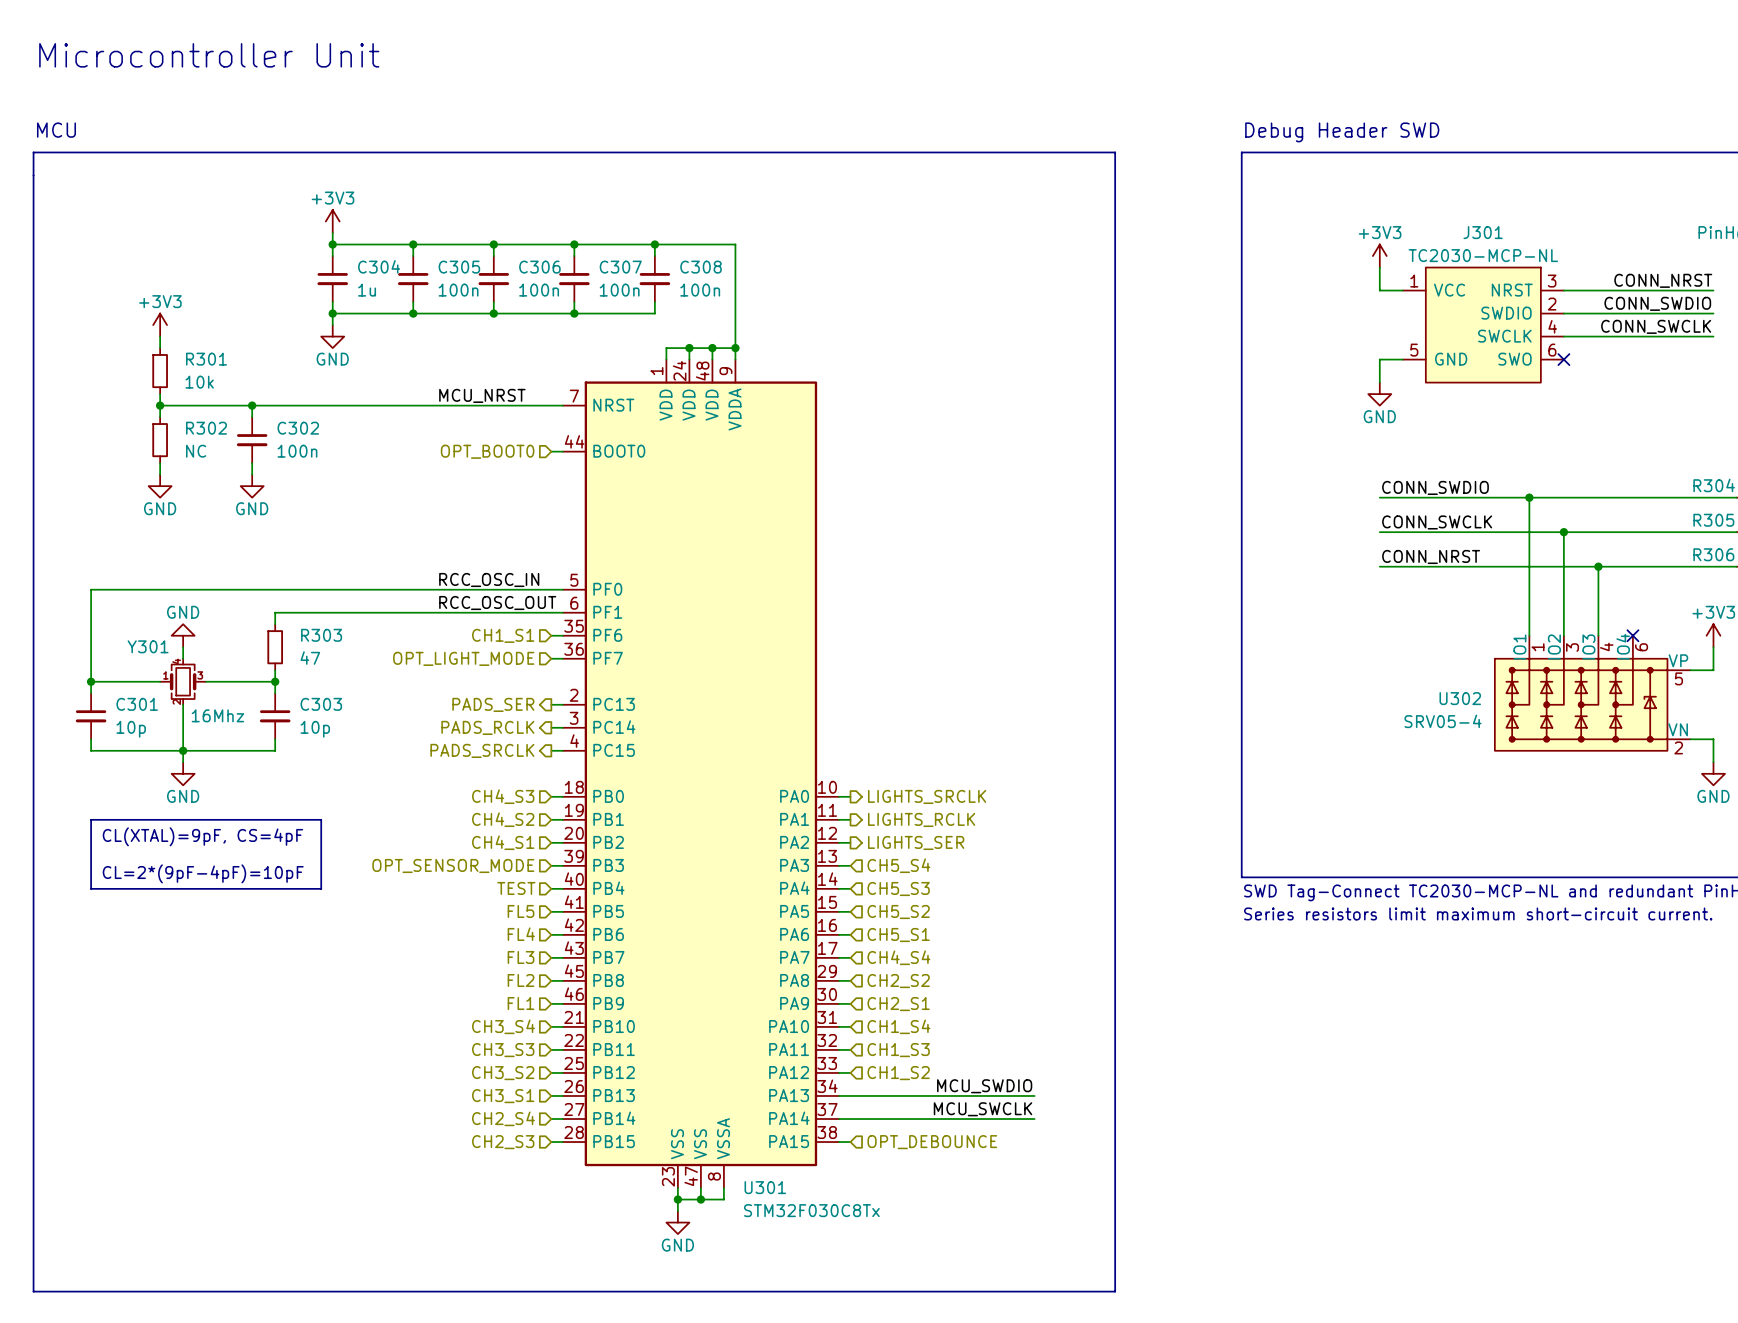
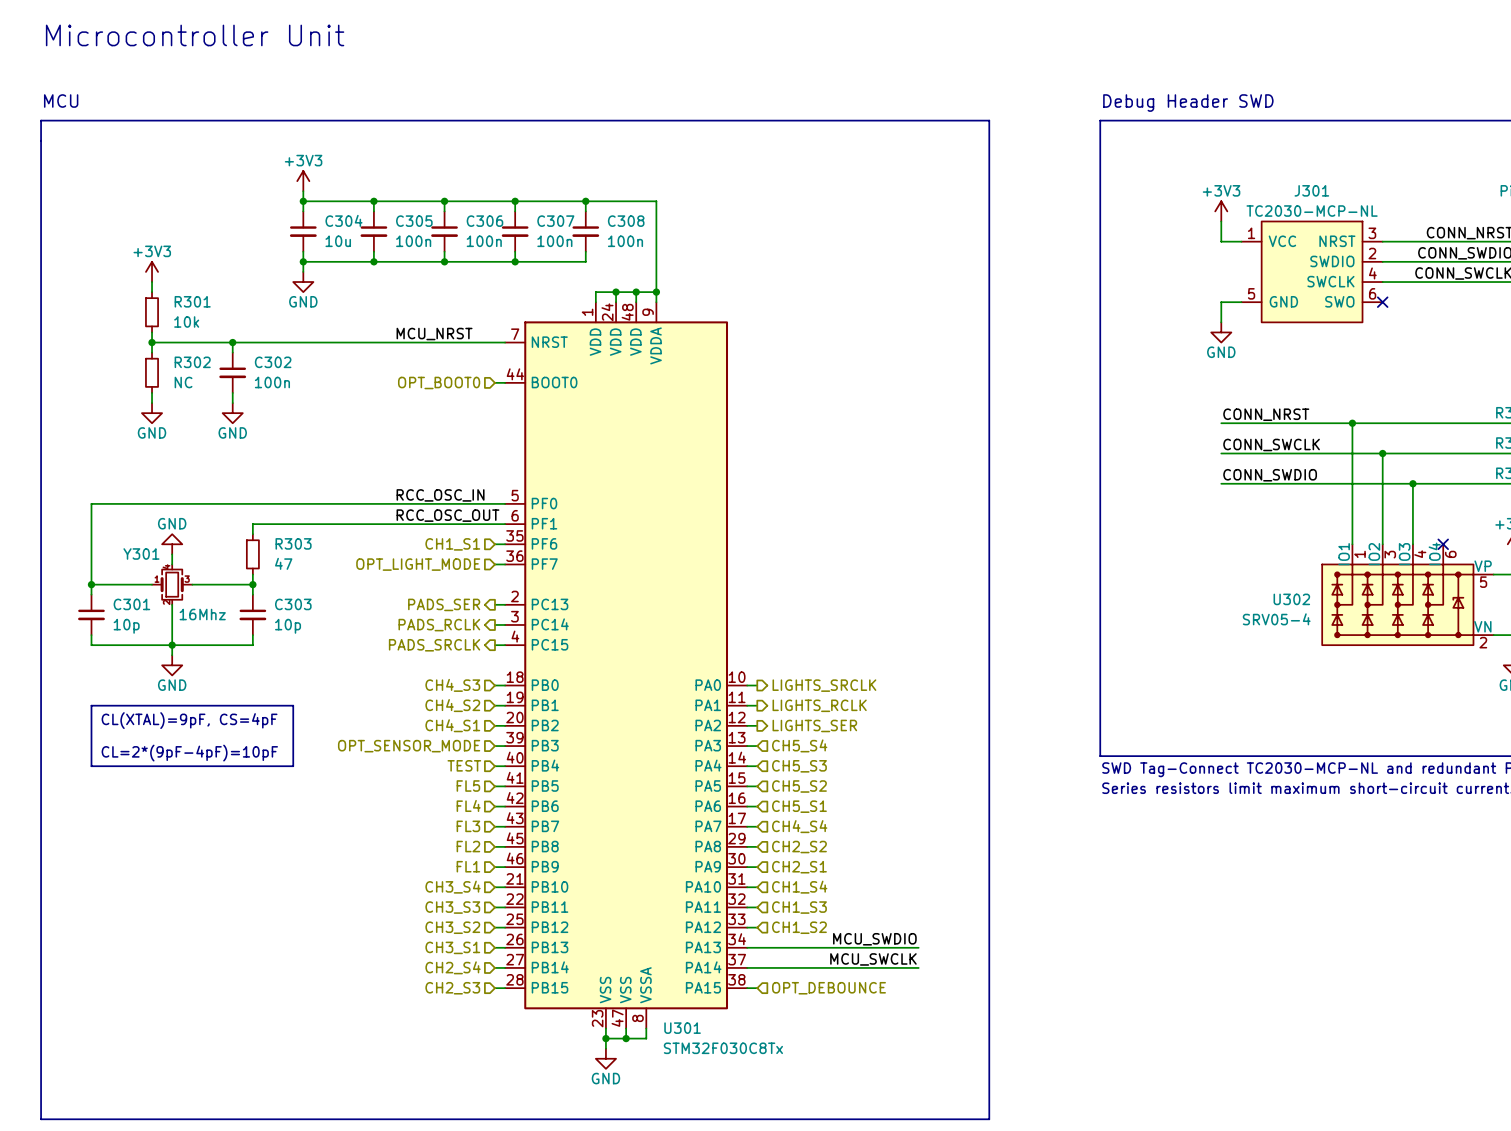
C304 value: 1u (367, 290) -> 10u (338, 241)
label: CONN_SWDIO (1435, 487) -> CONN_NRST (1266, 414)
label: CONN_NRST (1431, 556) -> CONN_SWDIO (1270, 475)

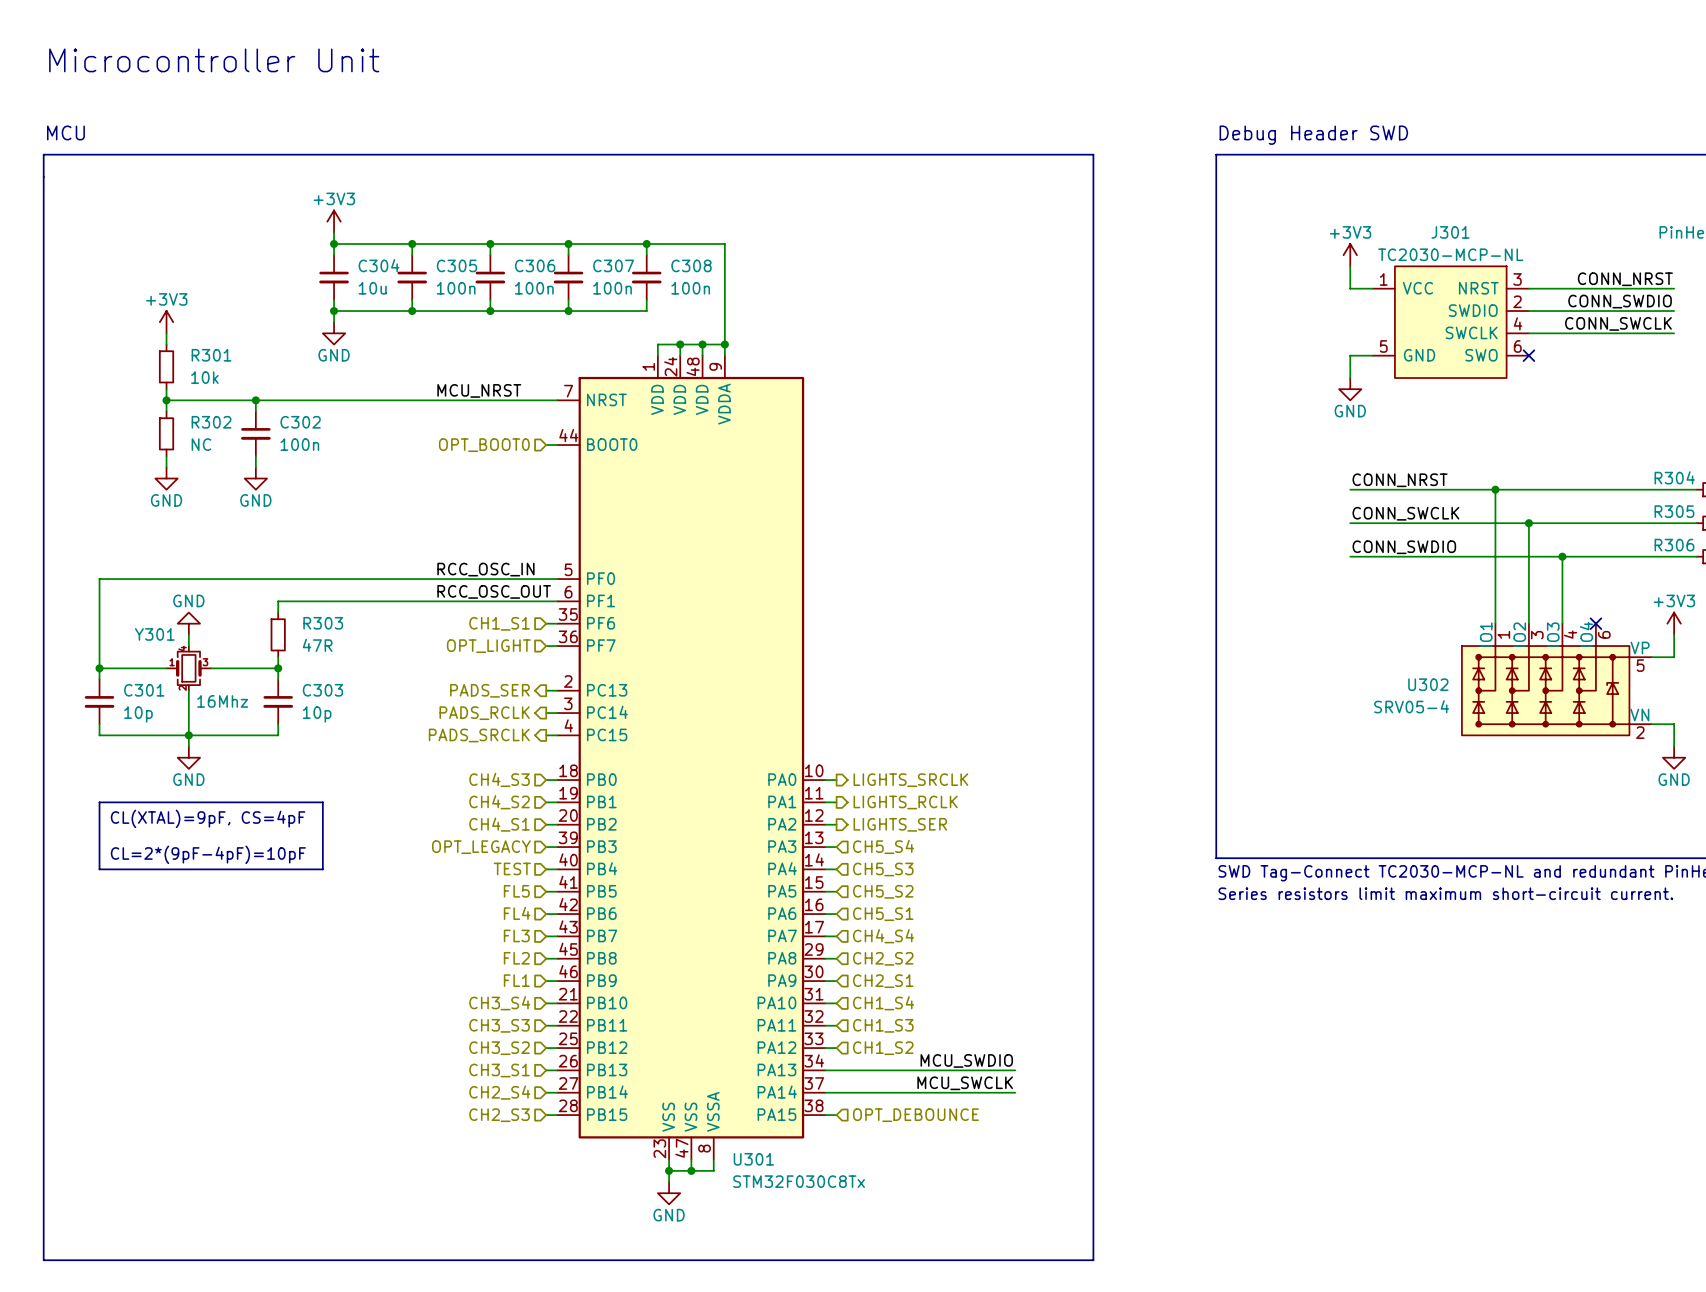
R303 value: 47 (283, 563) -> 47R (317, 645)
hierarchical label: OPT_LIGHT_MODE (418, 564) -> OPT_LIGHT (488, 646)
hierarchical label: OPT_SENSOR_MODE (409, 746) -> OPT_LEGACY (481, 847)

